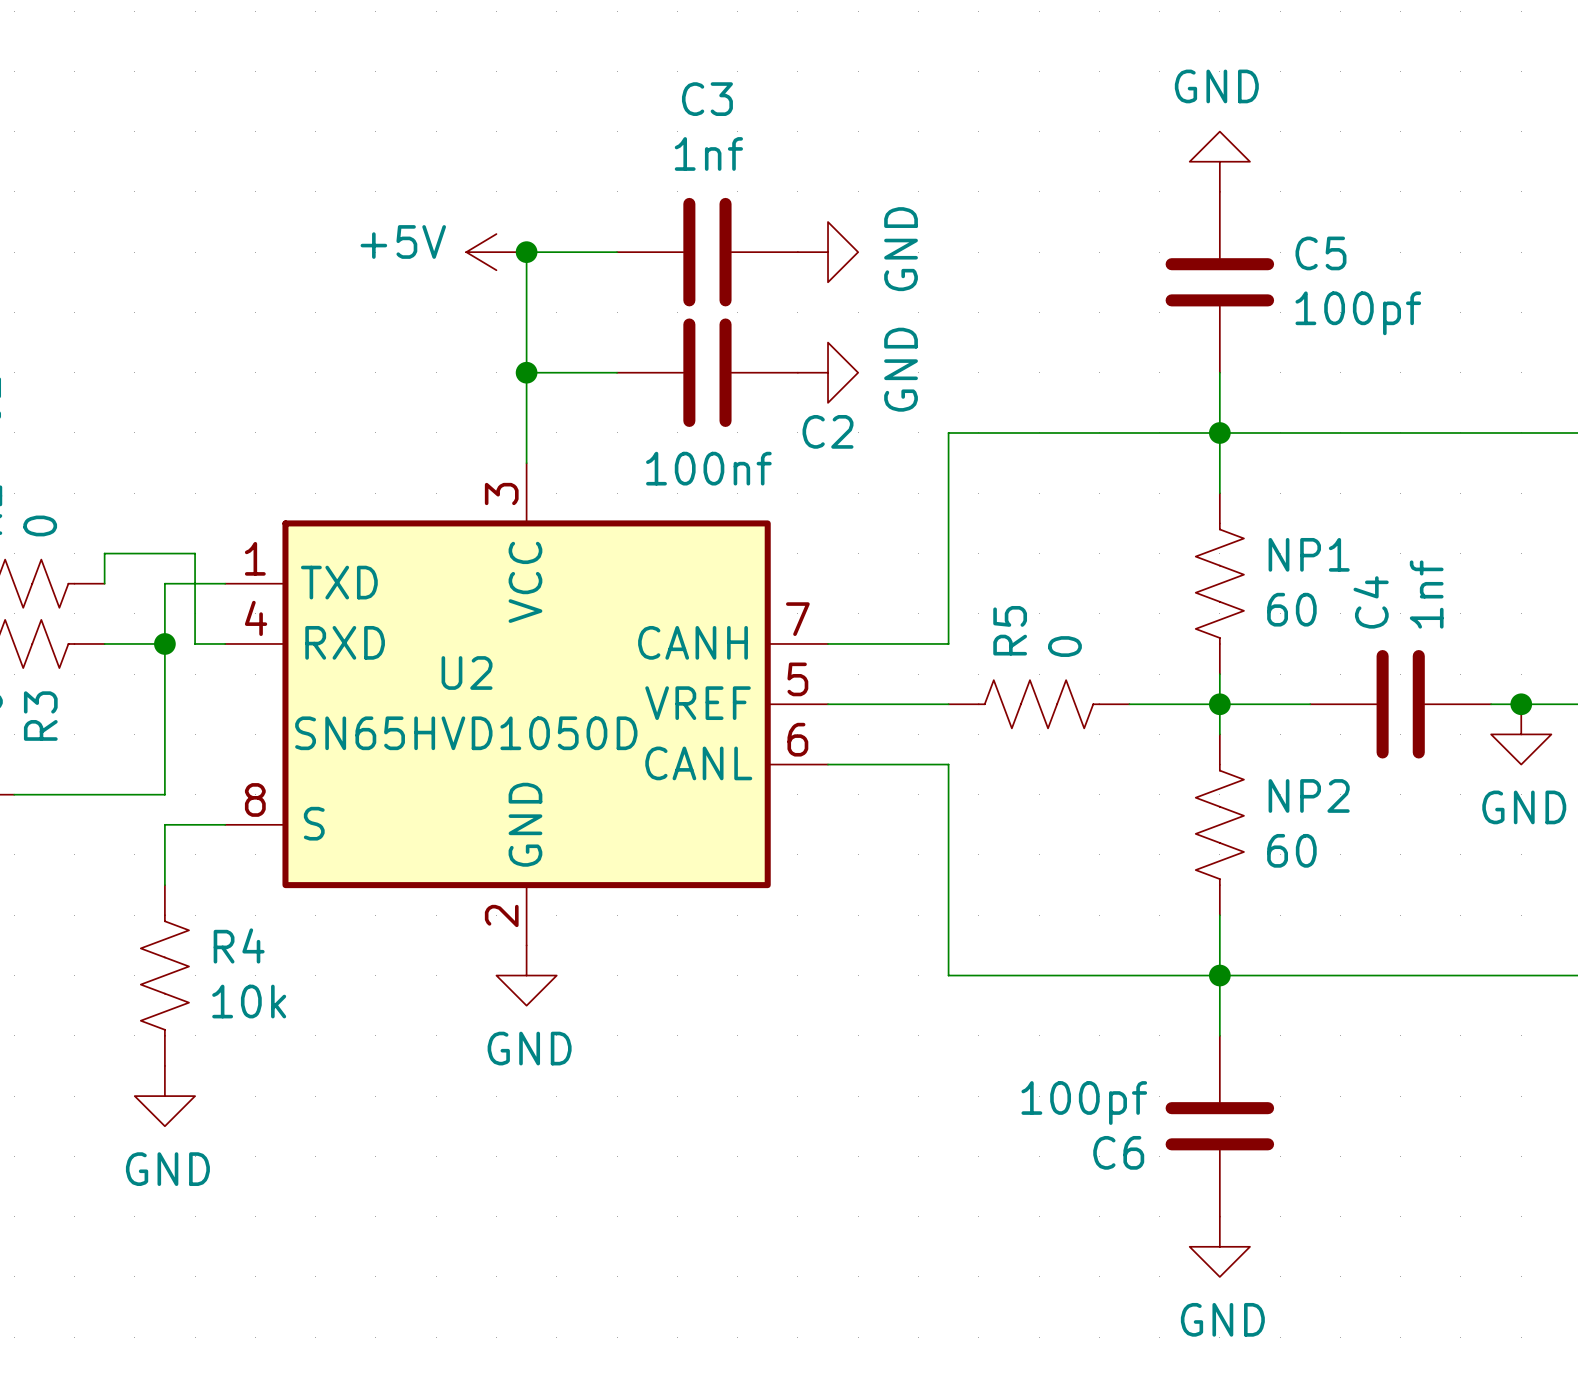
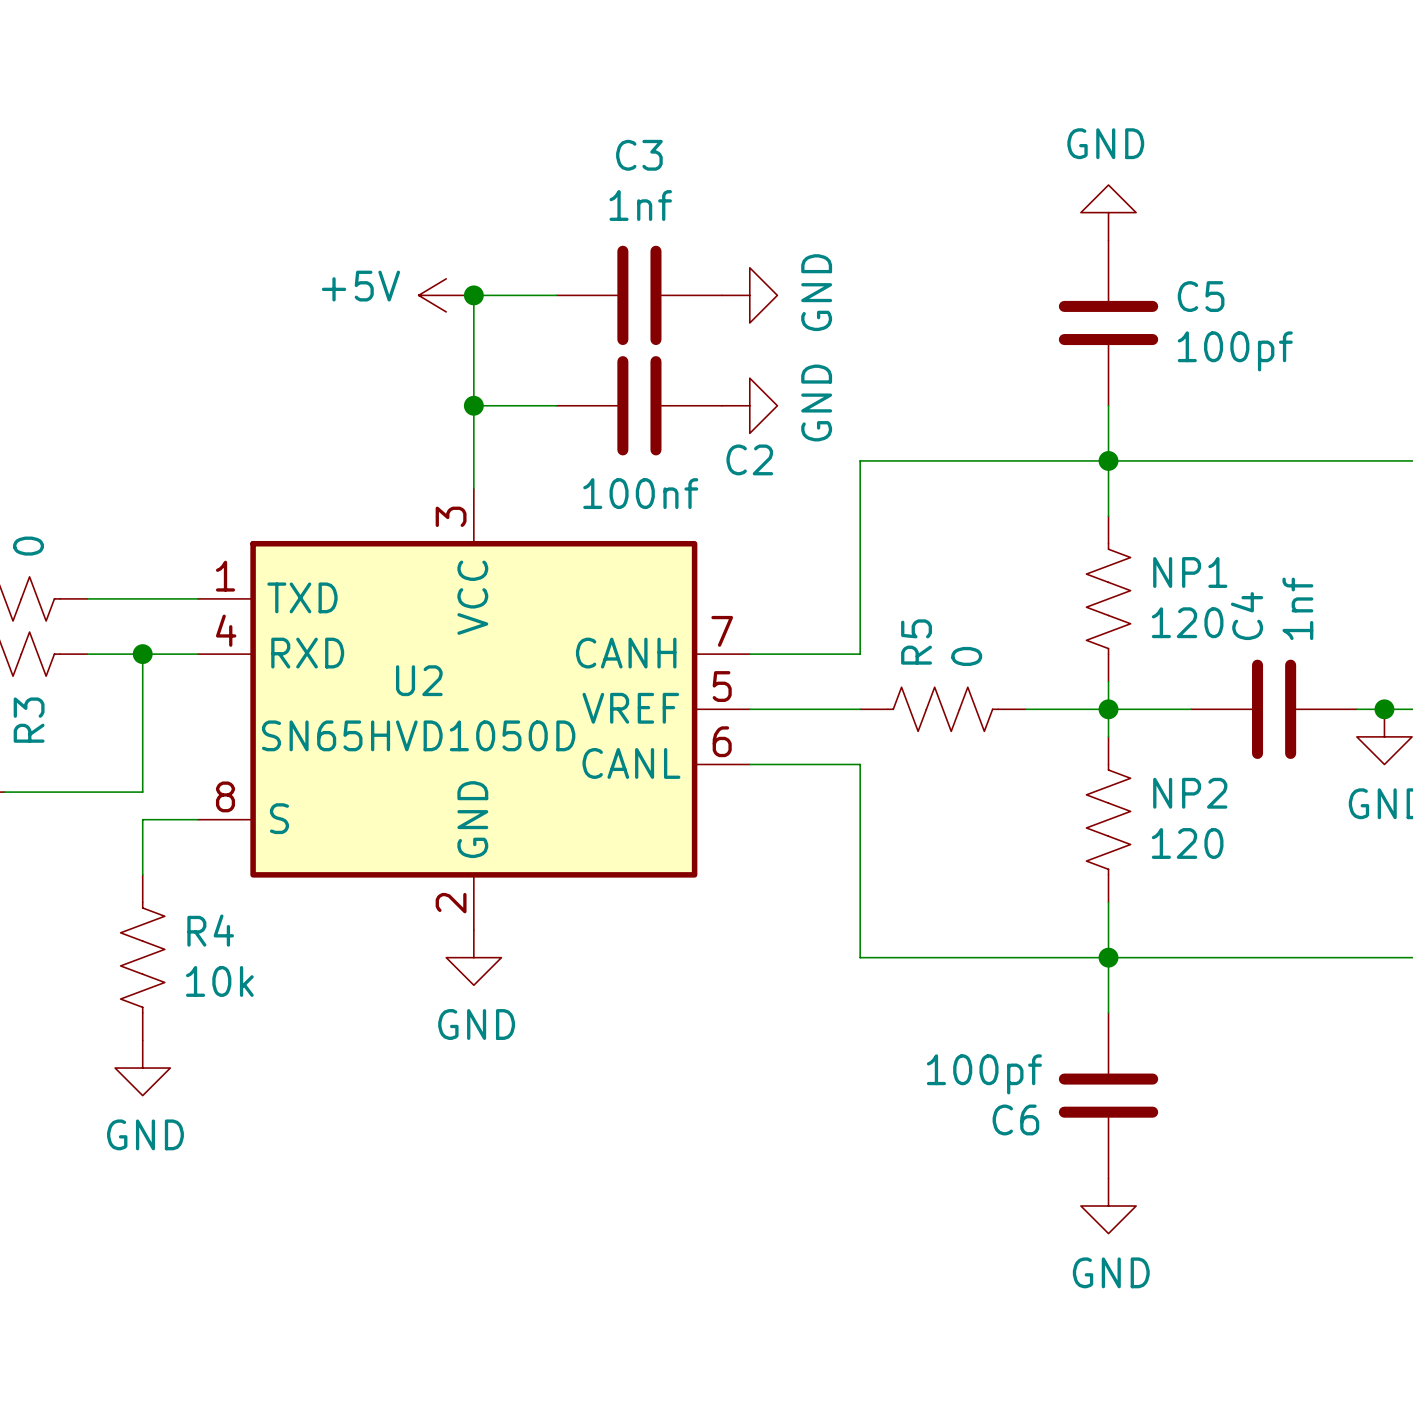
wire: (104, 583) (104, 553) (195, 553) (195, 643) -> (87, 598) (142, 598)
wire: (164, 583) (164, 643) -> (170, 654) (142, 654)
NP1 value: 60 (1291, 609) -> 120 (1187, 622)
NP2 value: 60 (1291, 850) -> 120 (1187, 843)

